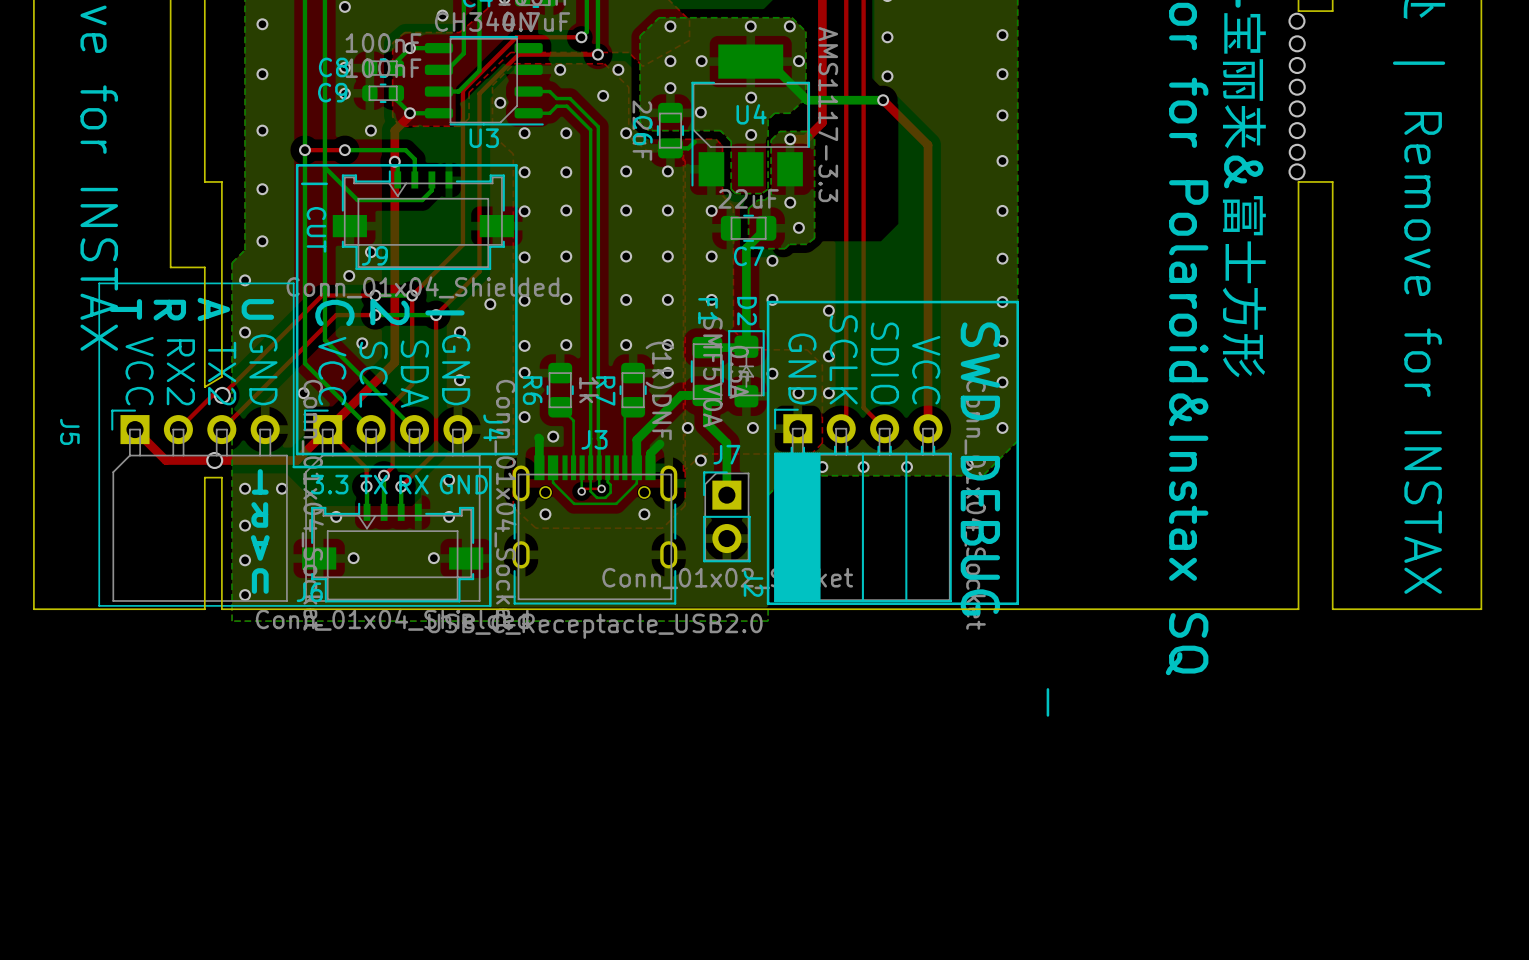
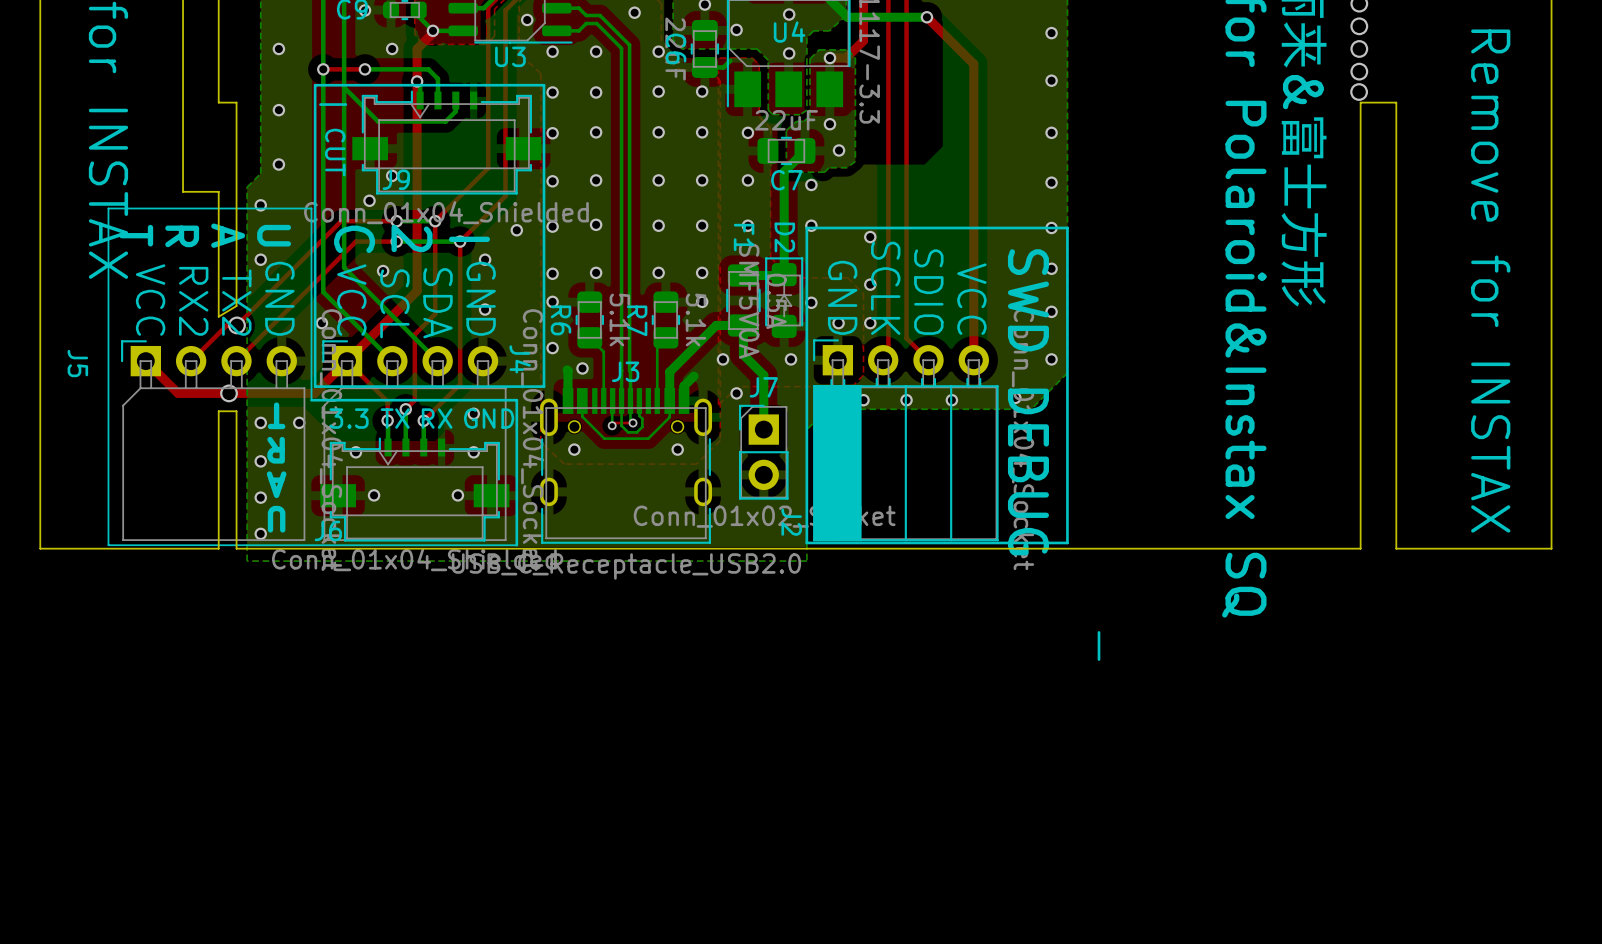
R6 value: 1k (589, 390) -> 5.1k (619, 319)
R7 value: (1k)DNF (659, 390) -> 5.1k (696, 319)

